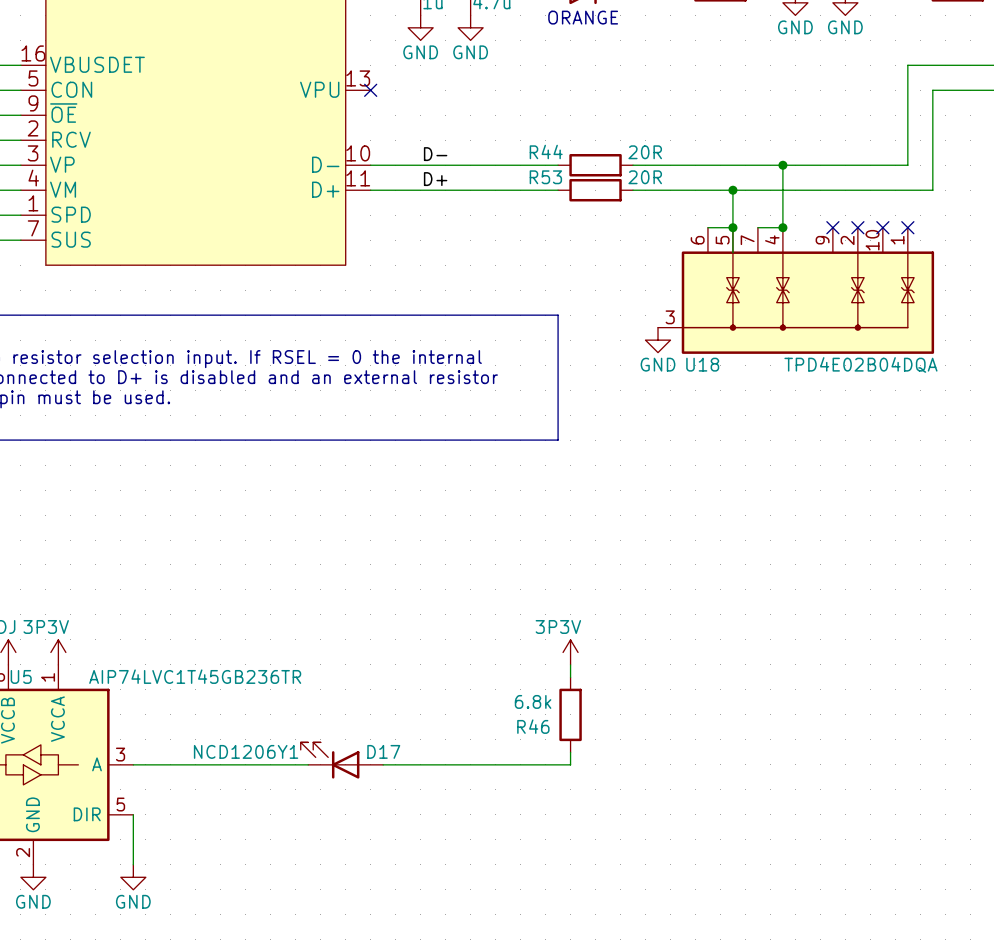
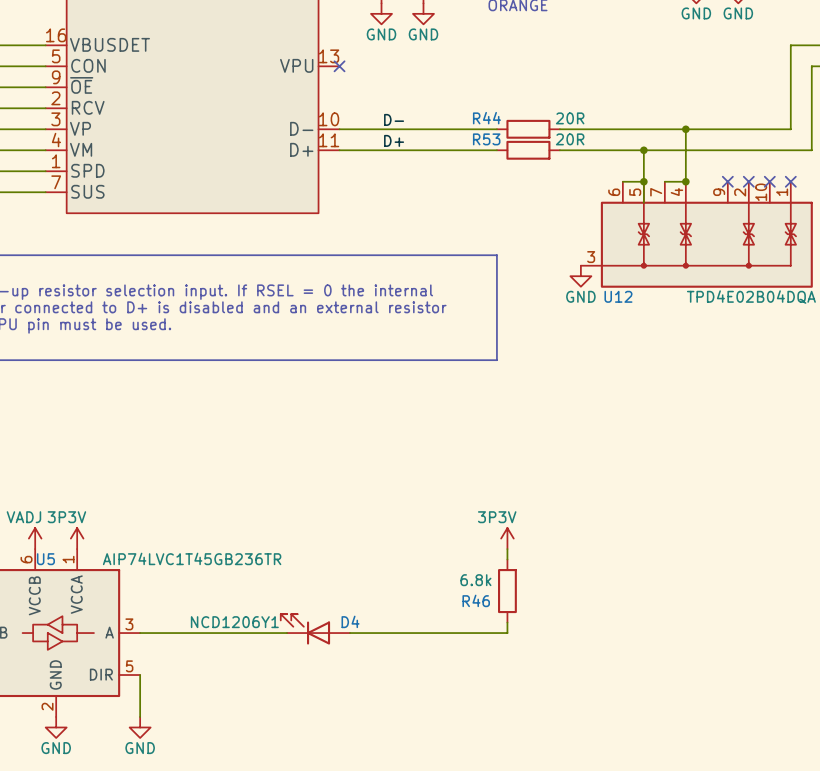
U18 name: U18 (702, 364) -> U12 (618, 296)
D17 name: D17 (383, 751) -> D4 (350, 621)

